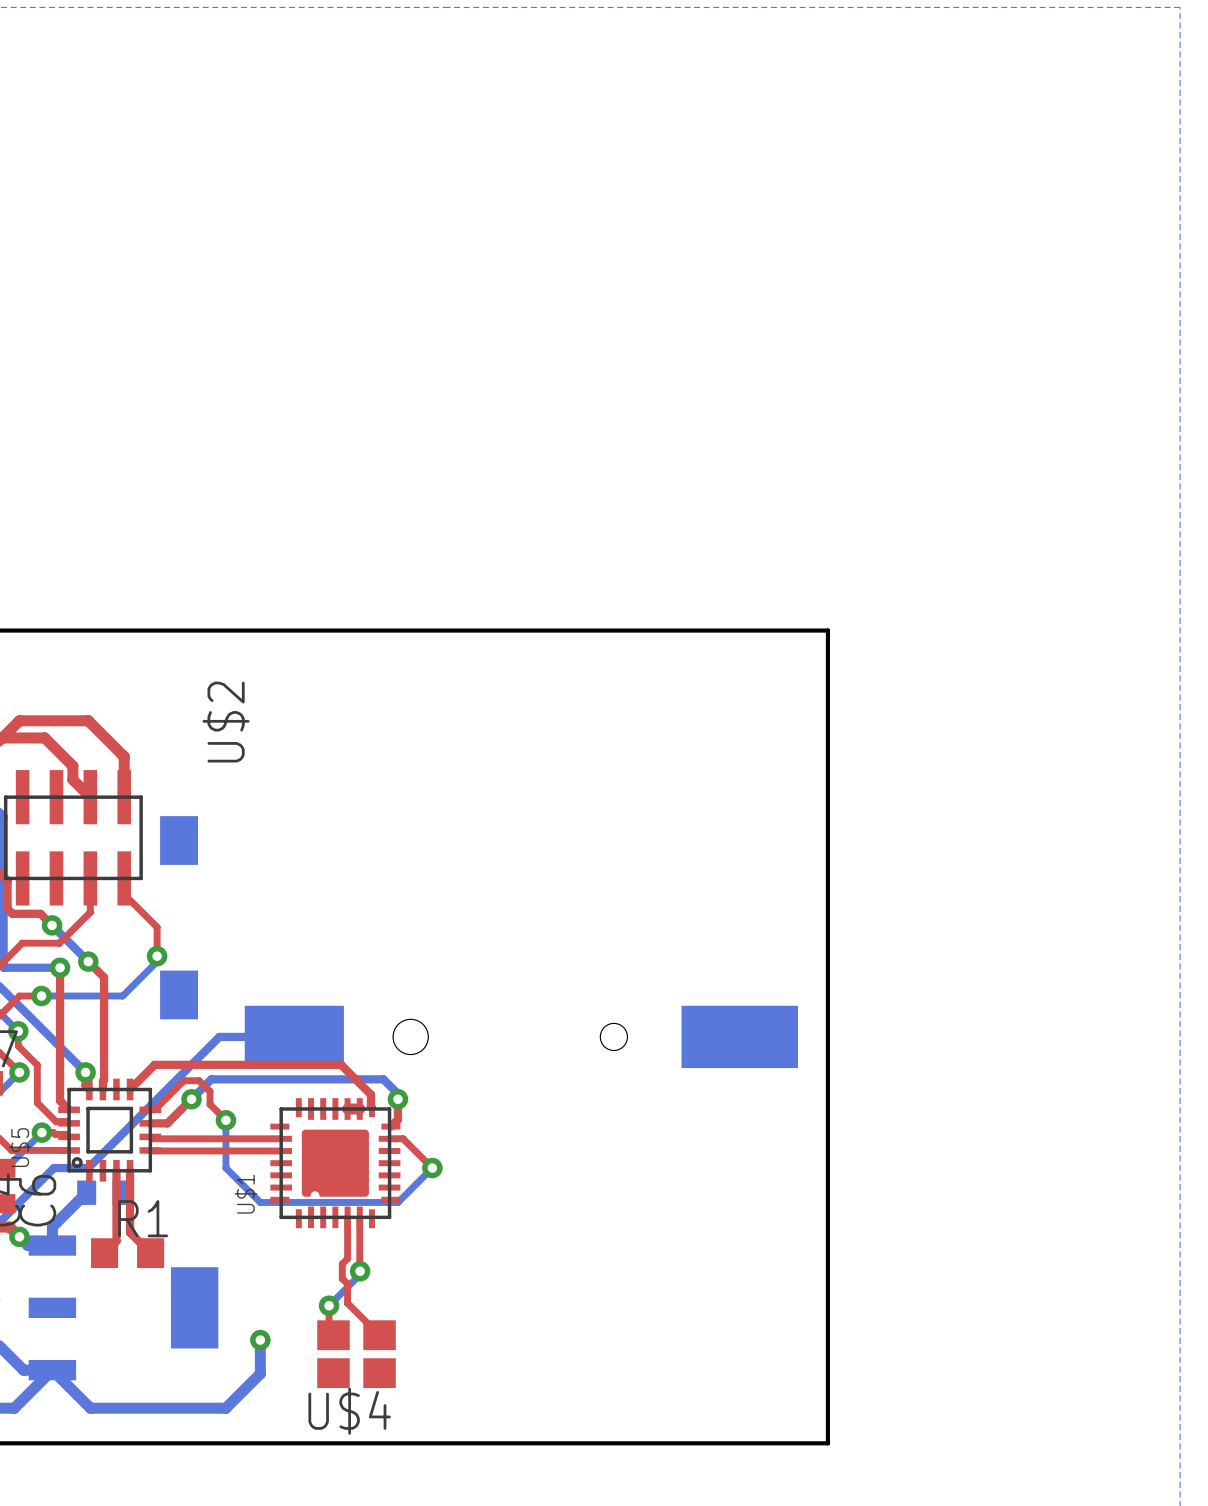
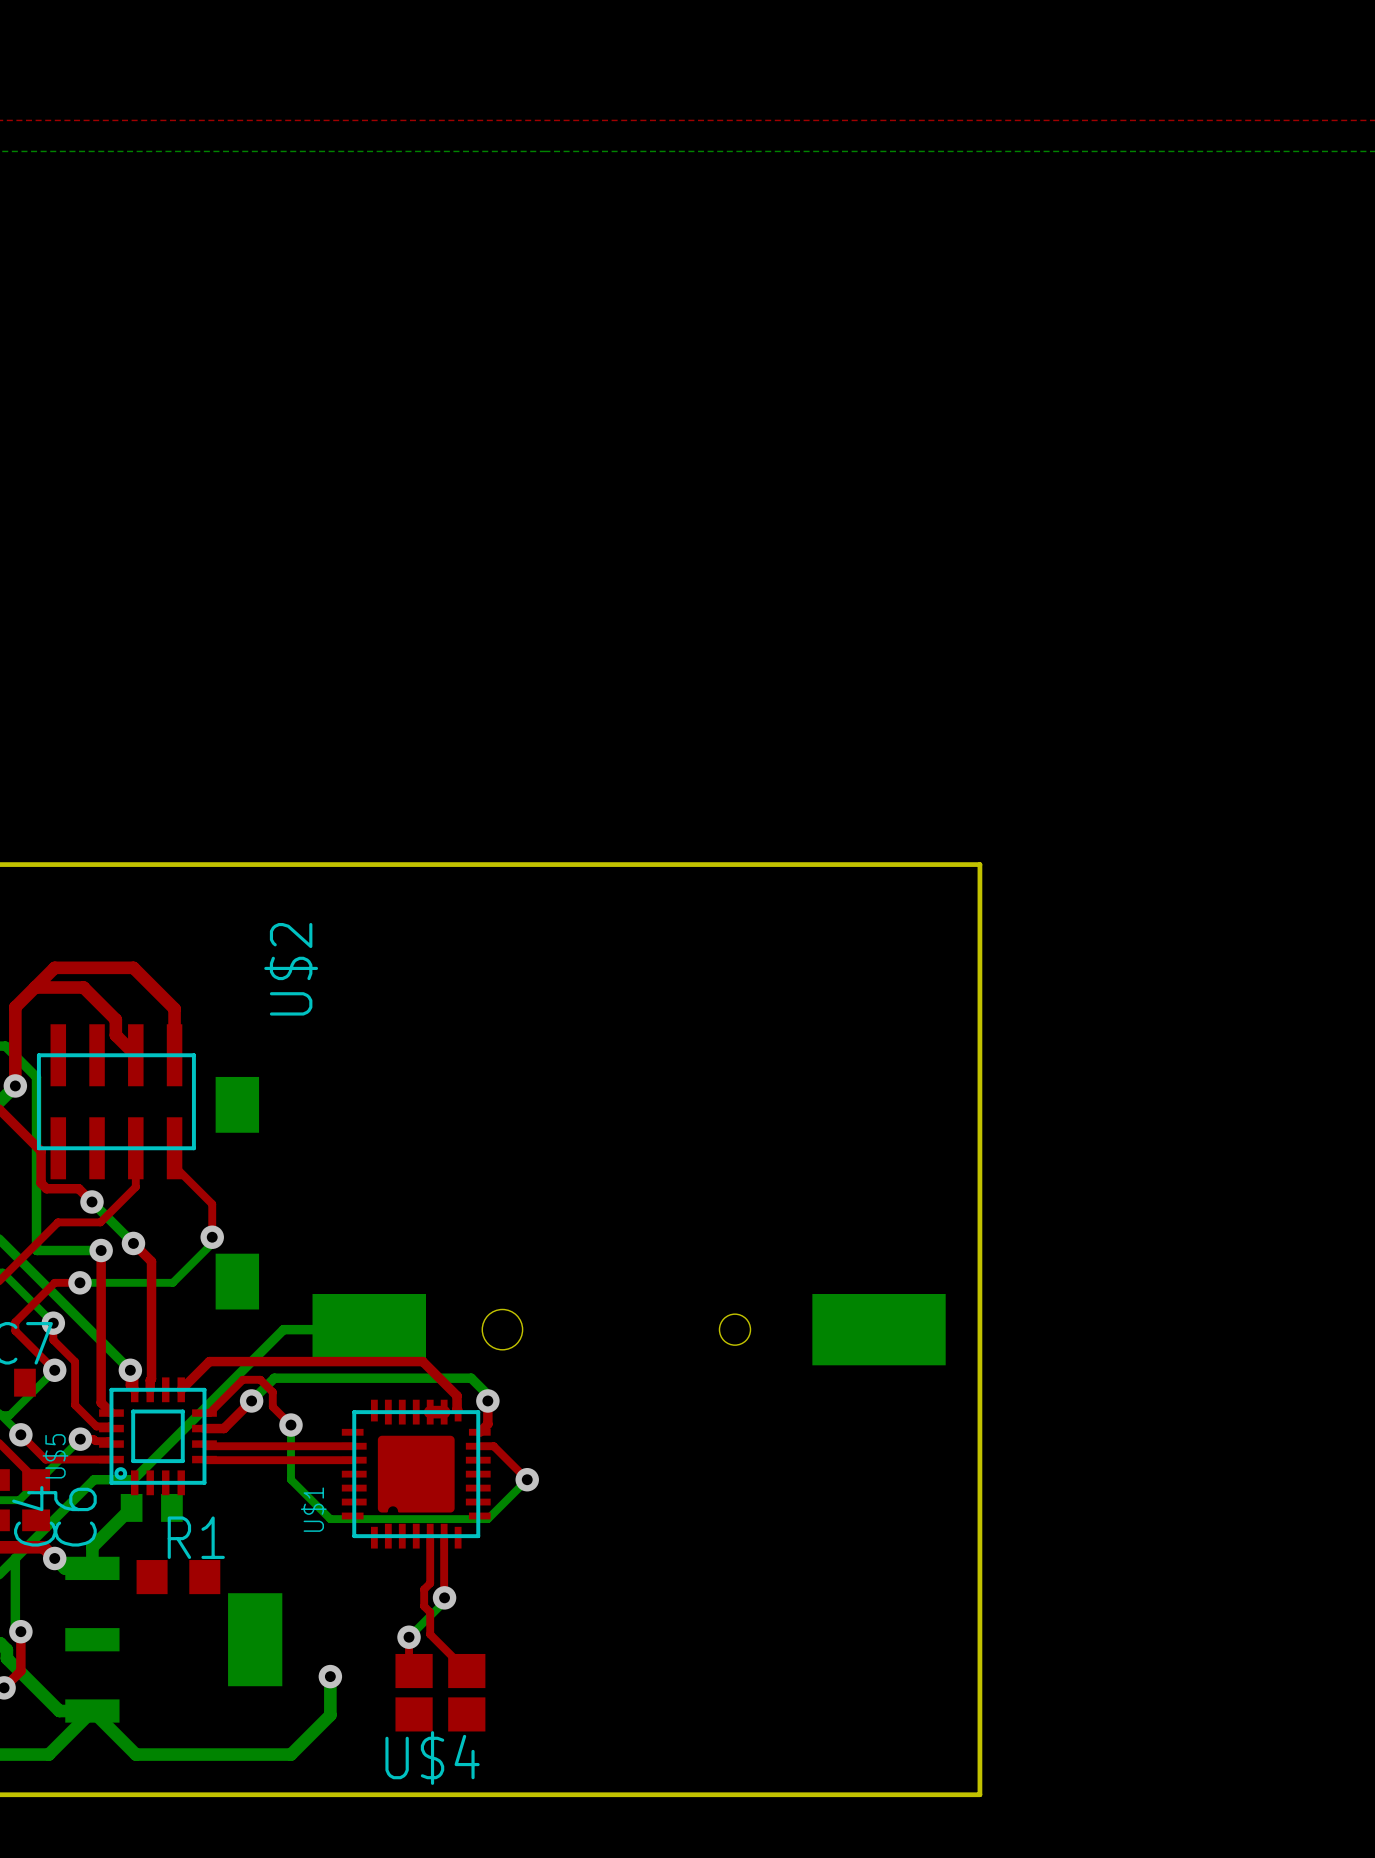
top track: (116, 1170) (116, 1241) (104, 1253) -> none
top track: (130, 1170) (130, 1232) (150, 1253) -> none

